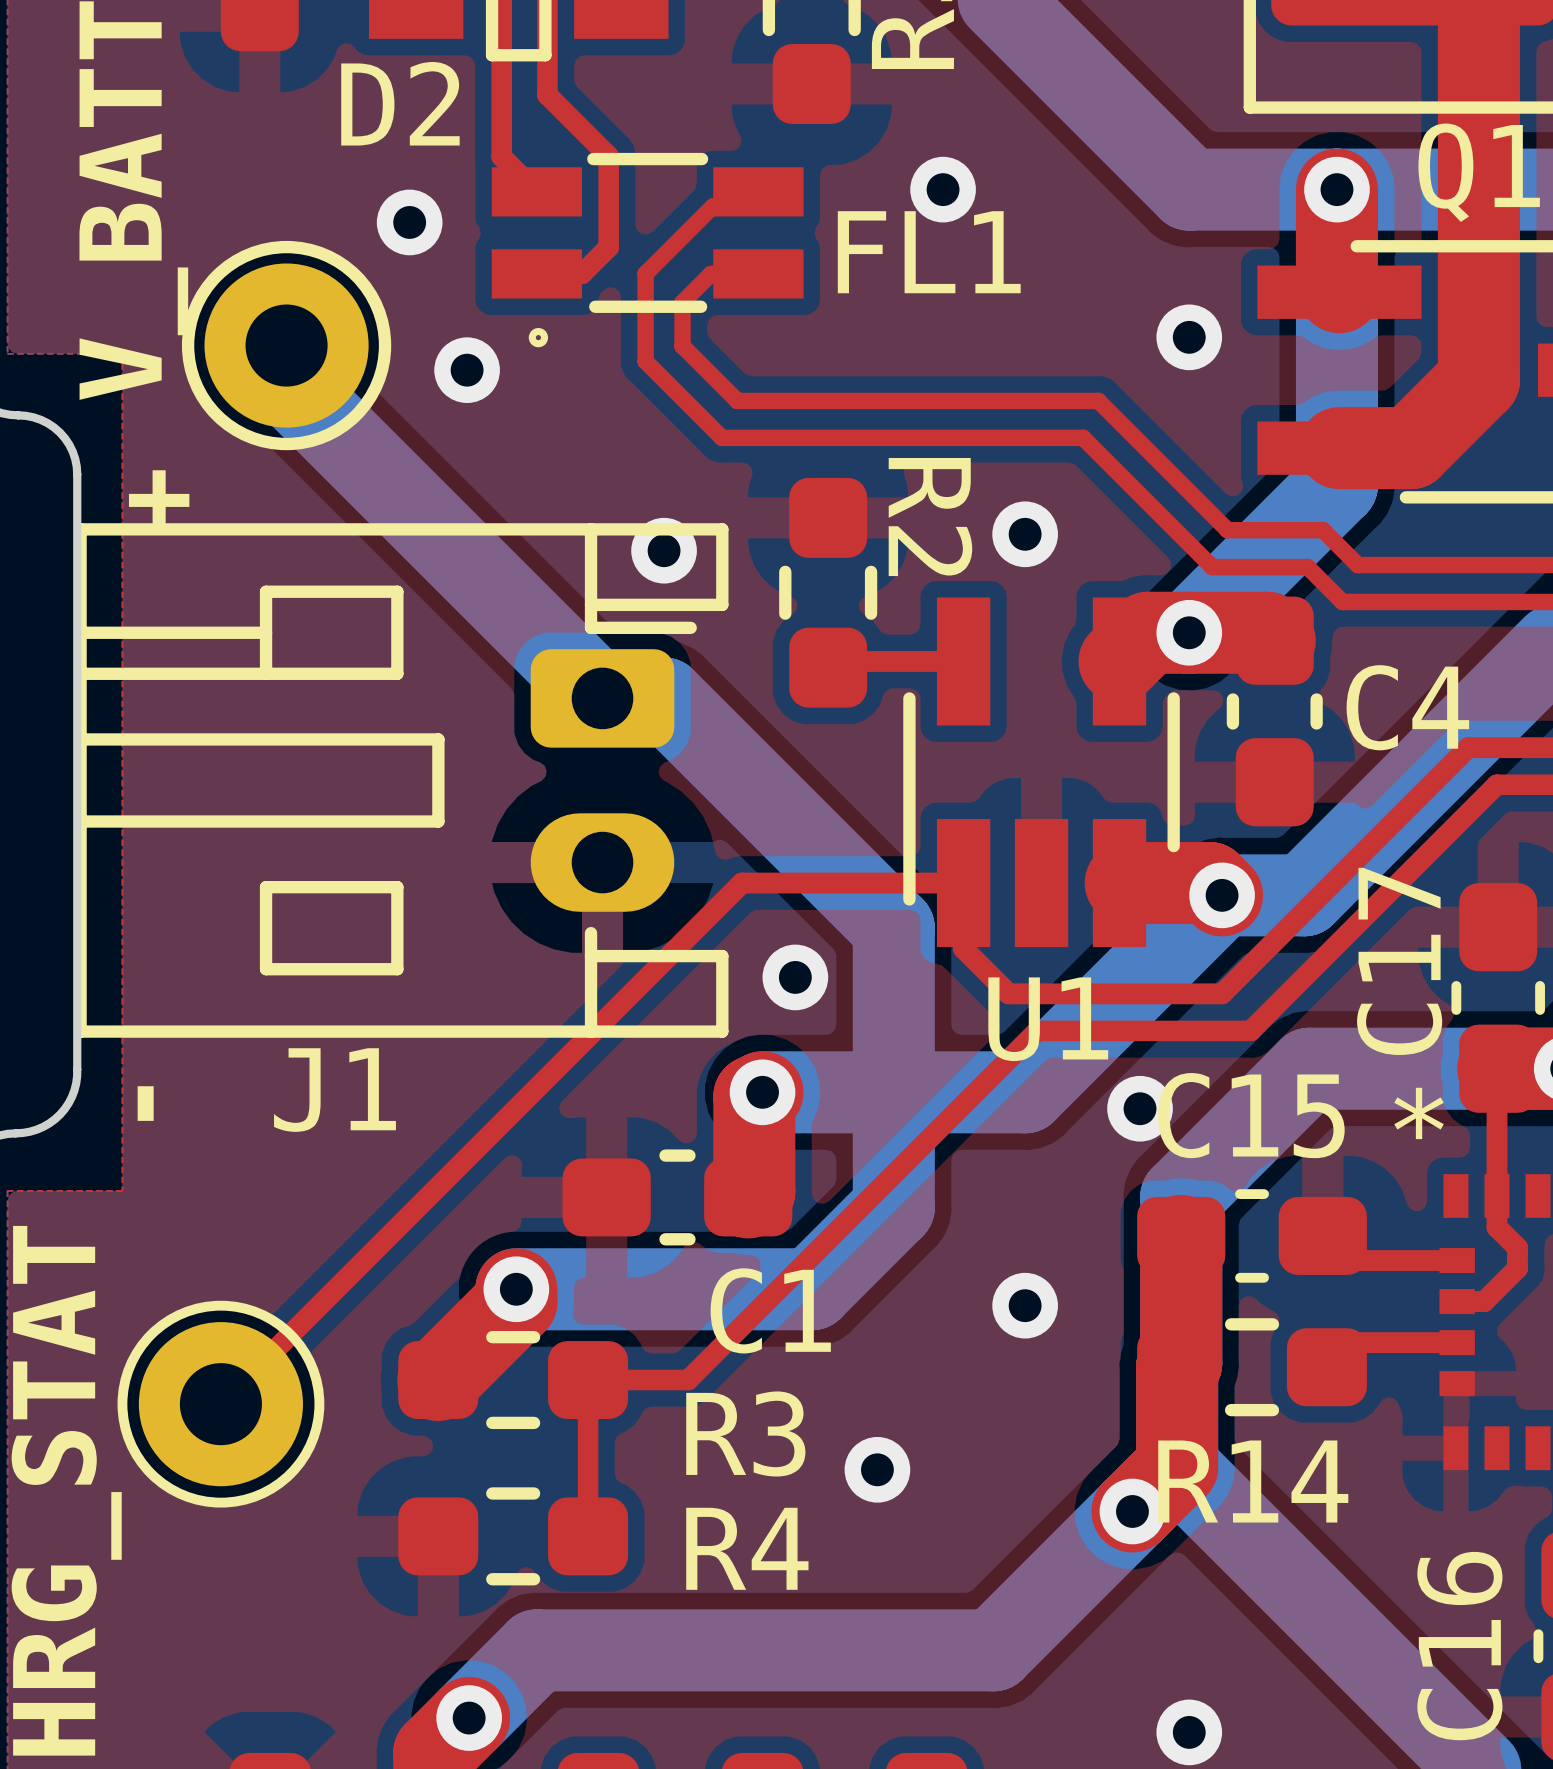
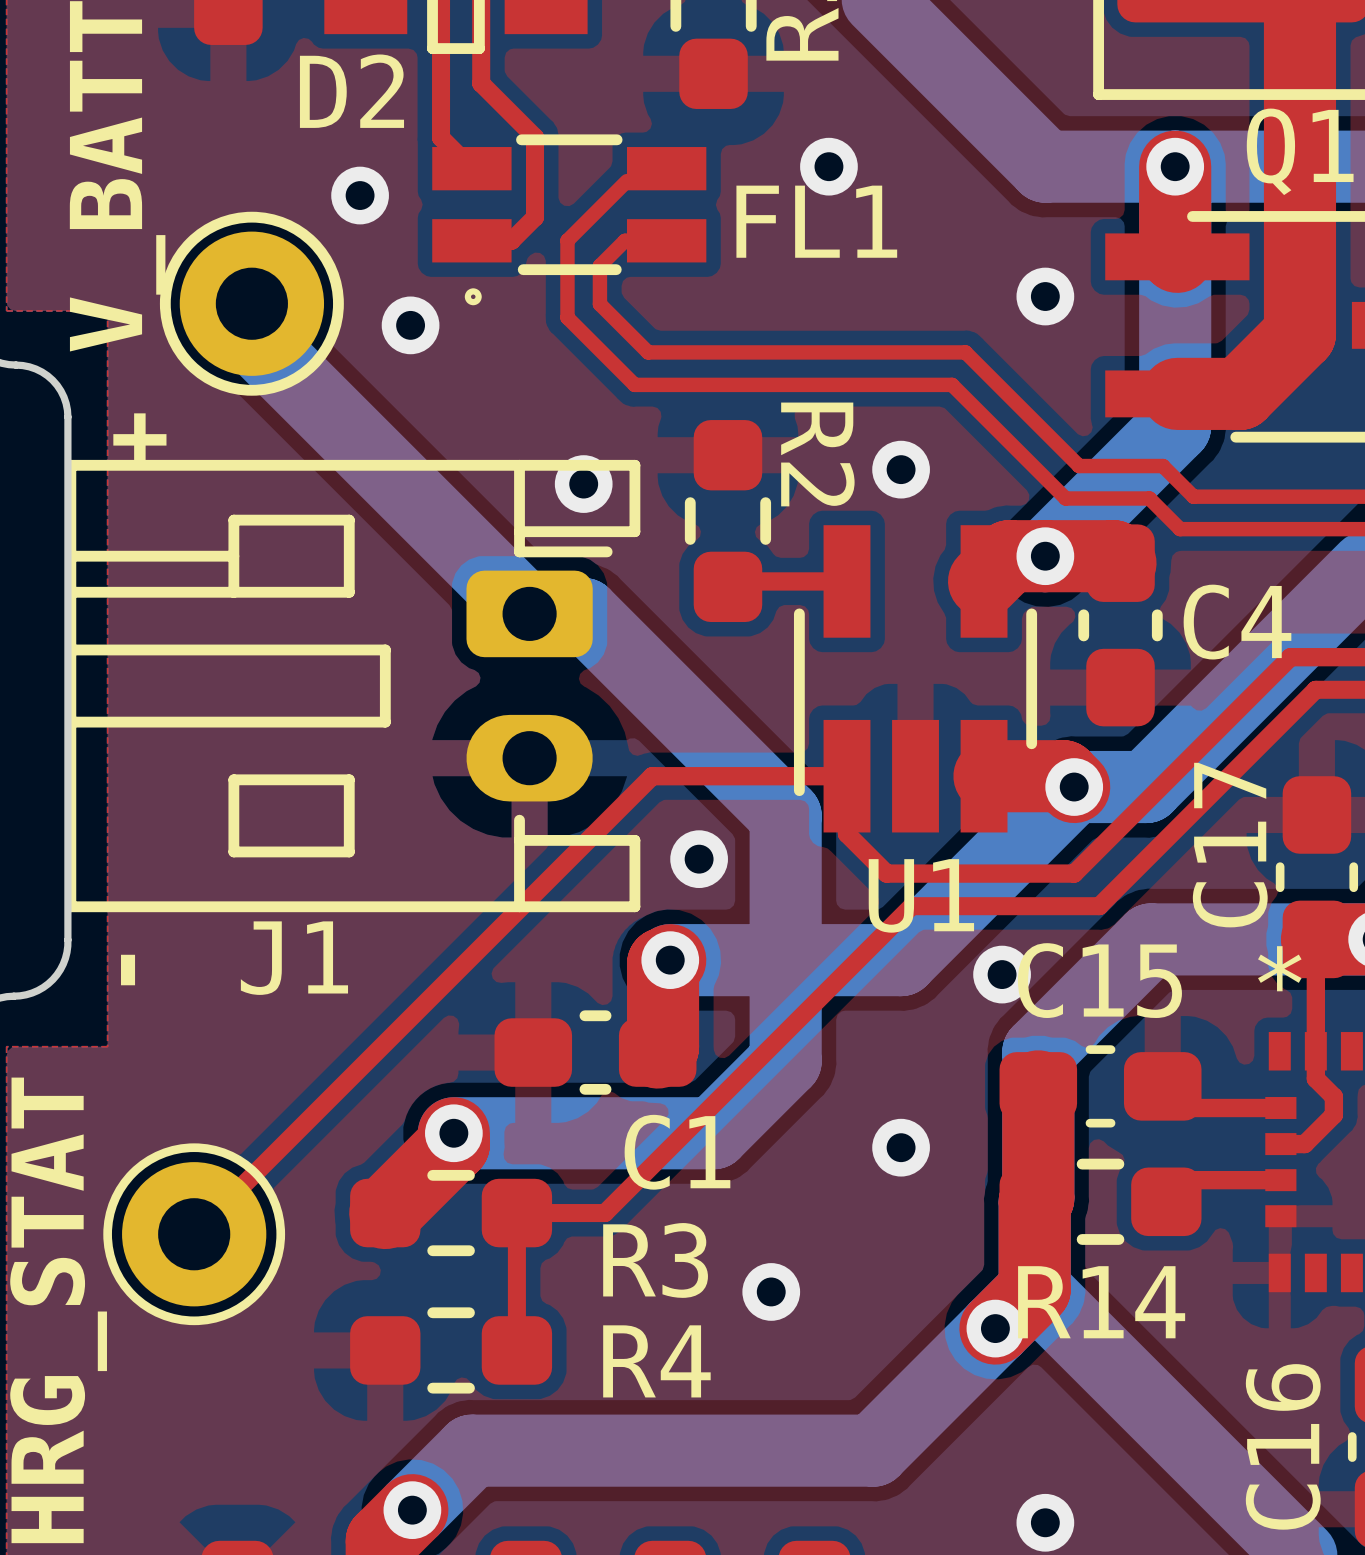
part text position: * (1419, 1113) -> * (1279, 968)

